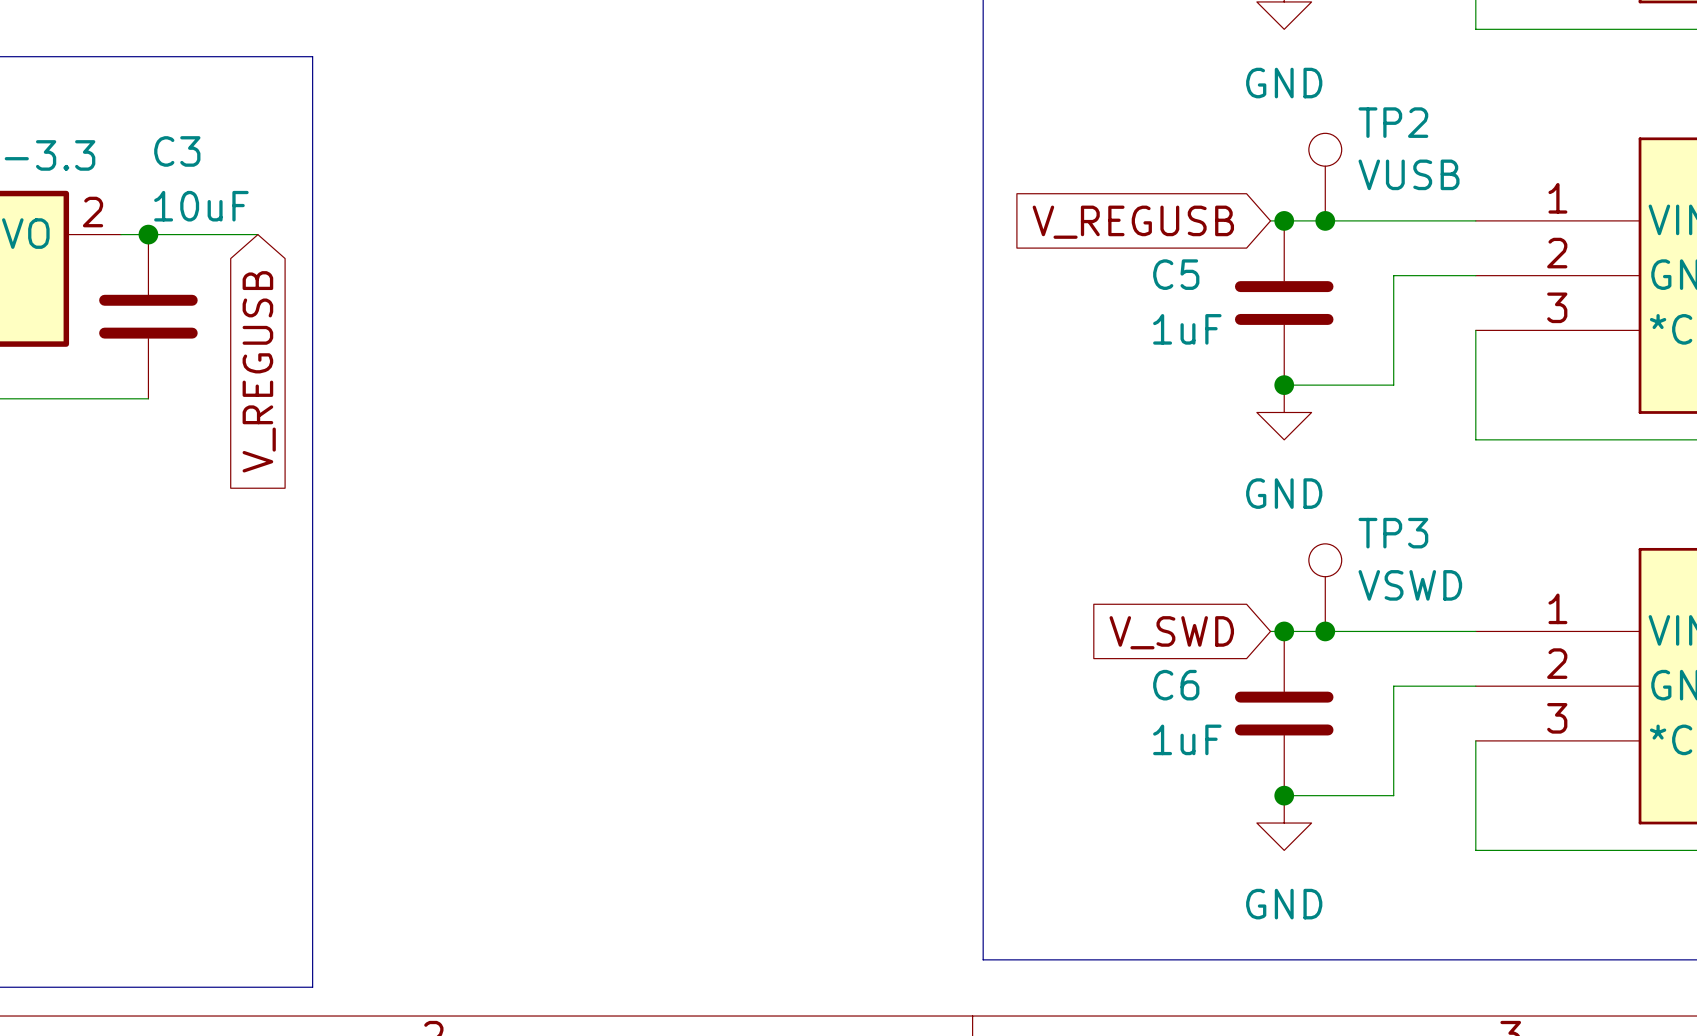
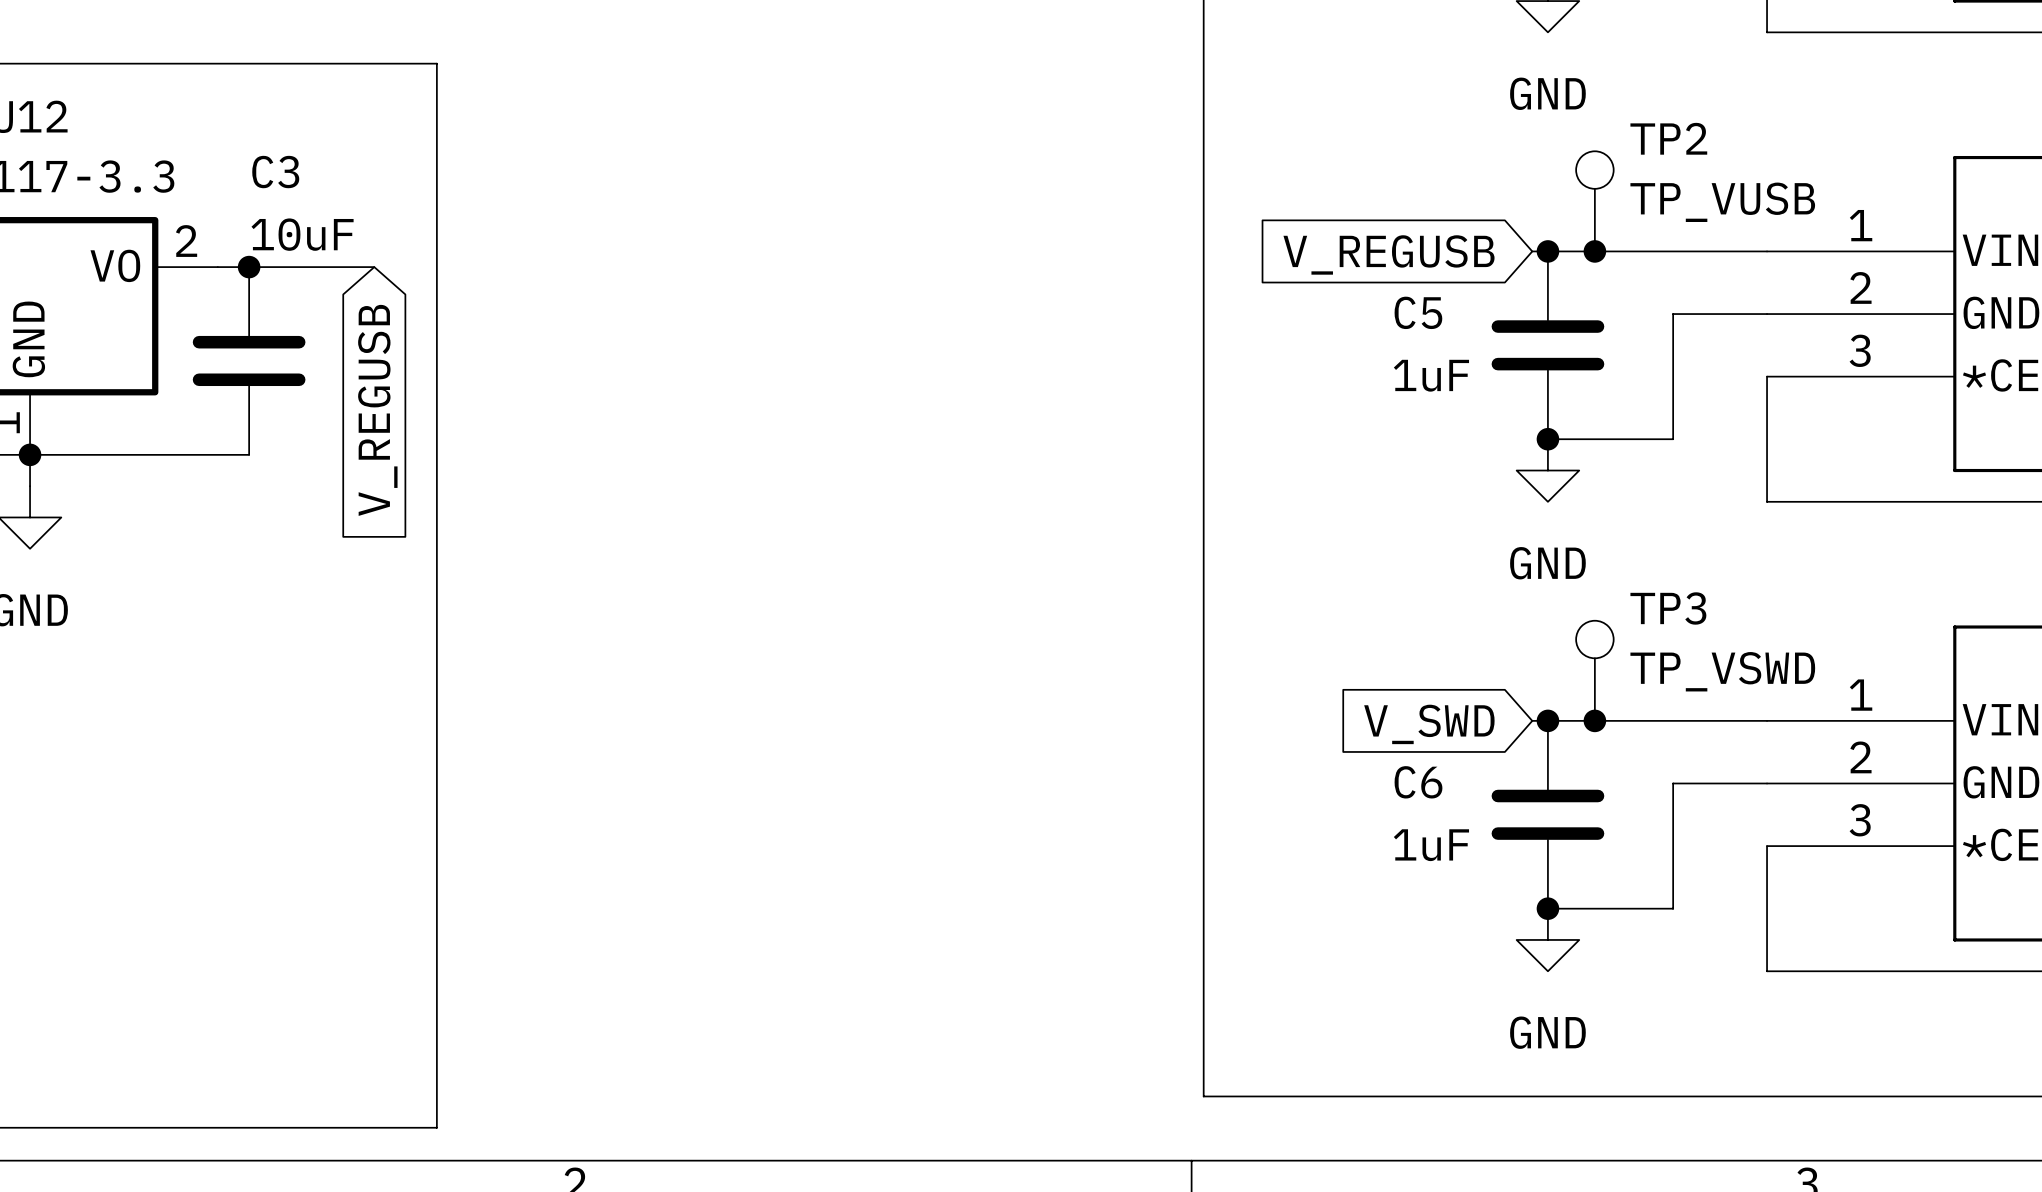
TP2 value: VUSB (1409, 174) -> TP_VUSB (1722, 202)
TP3 value: VSWD (1410, 585) -> TP_VSWD (1722, 671)

